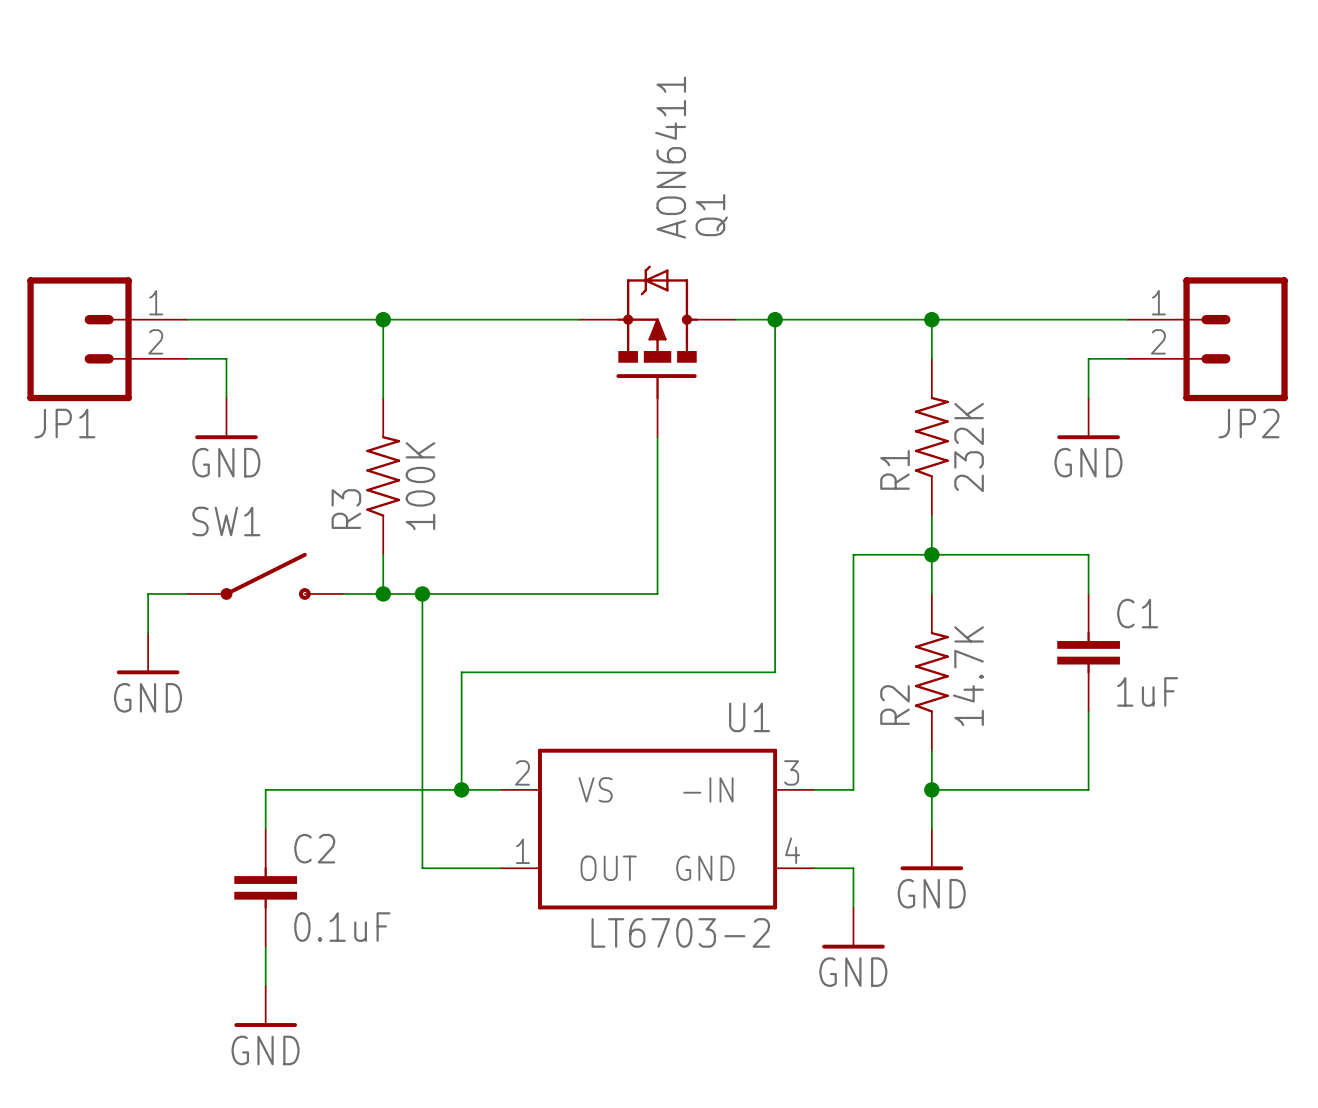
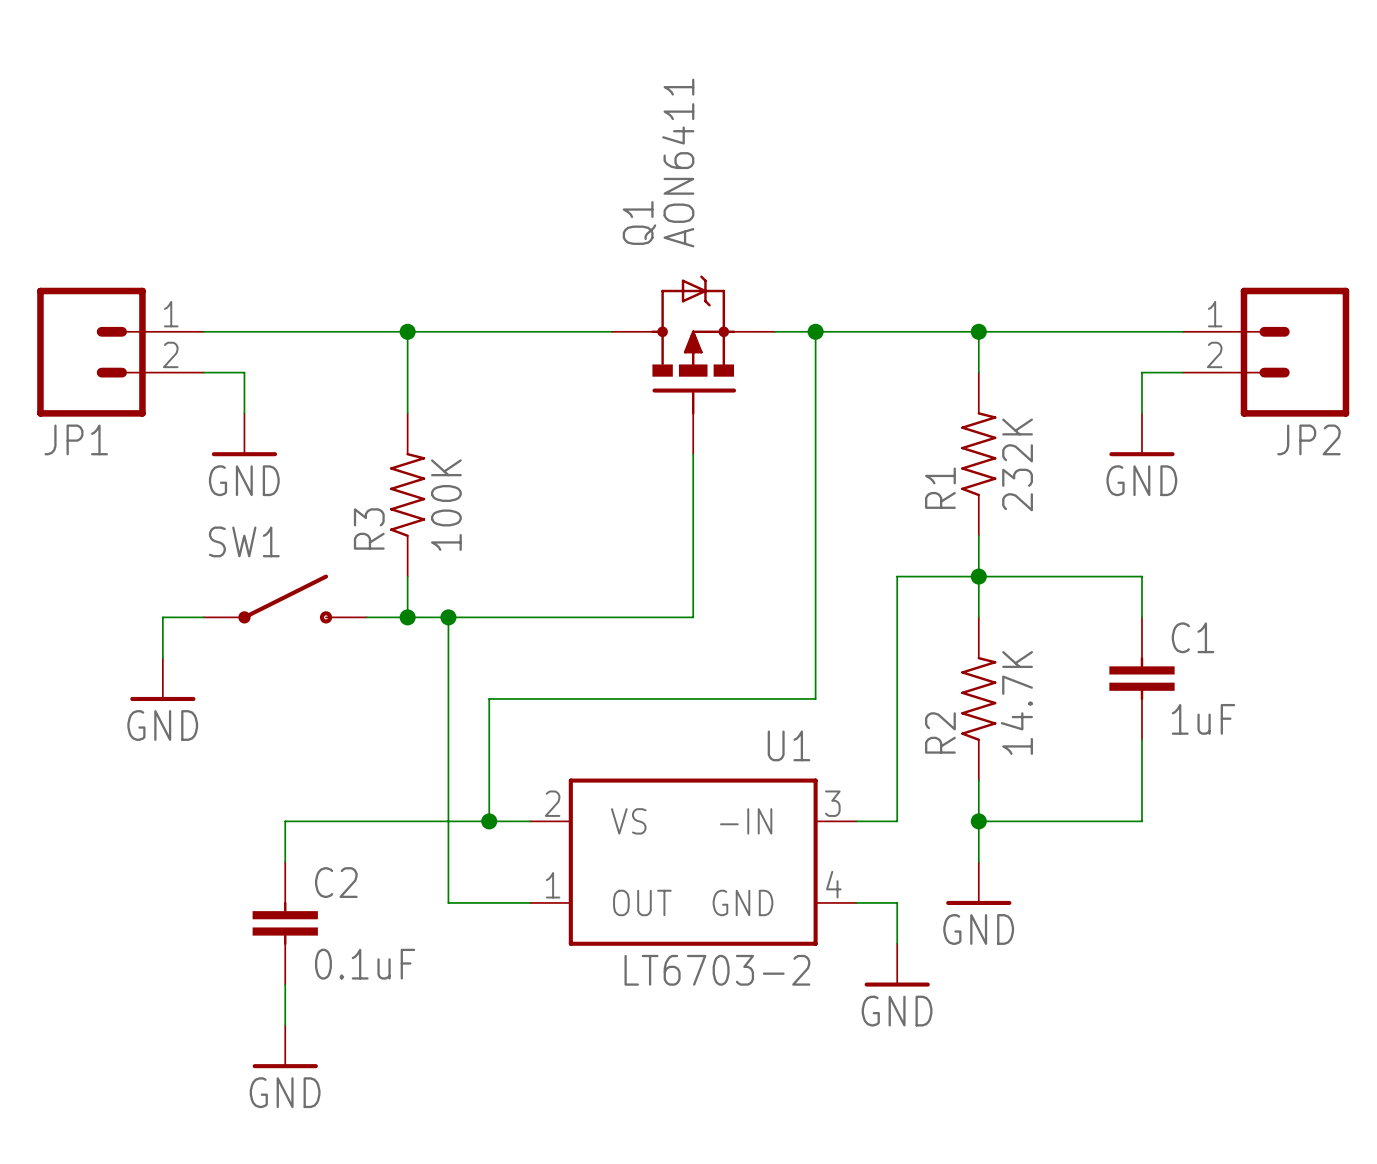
Q1 flip: as is (657, 332) -> left-right (693, 345)

